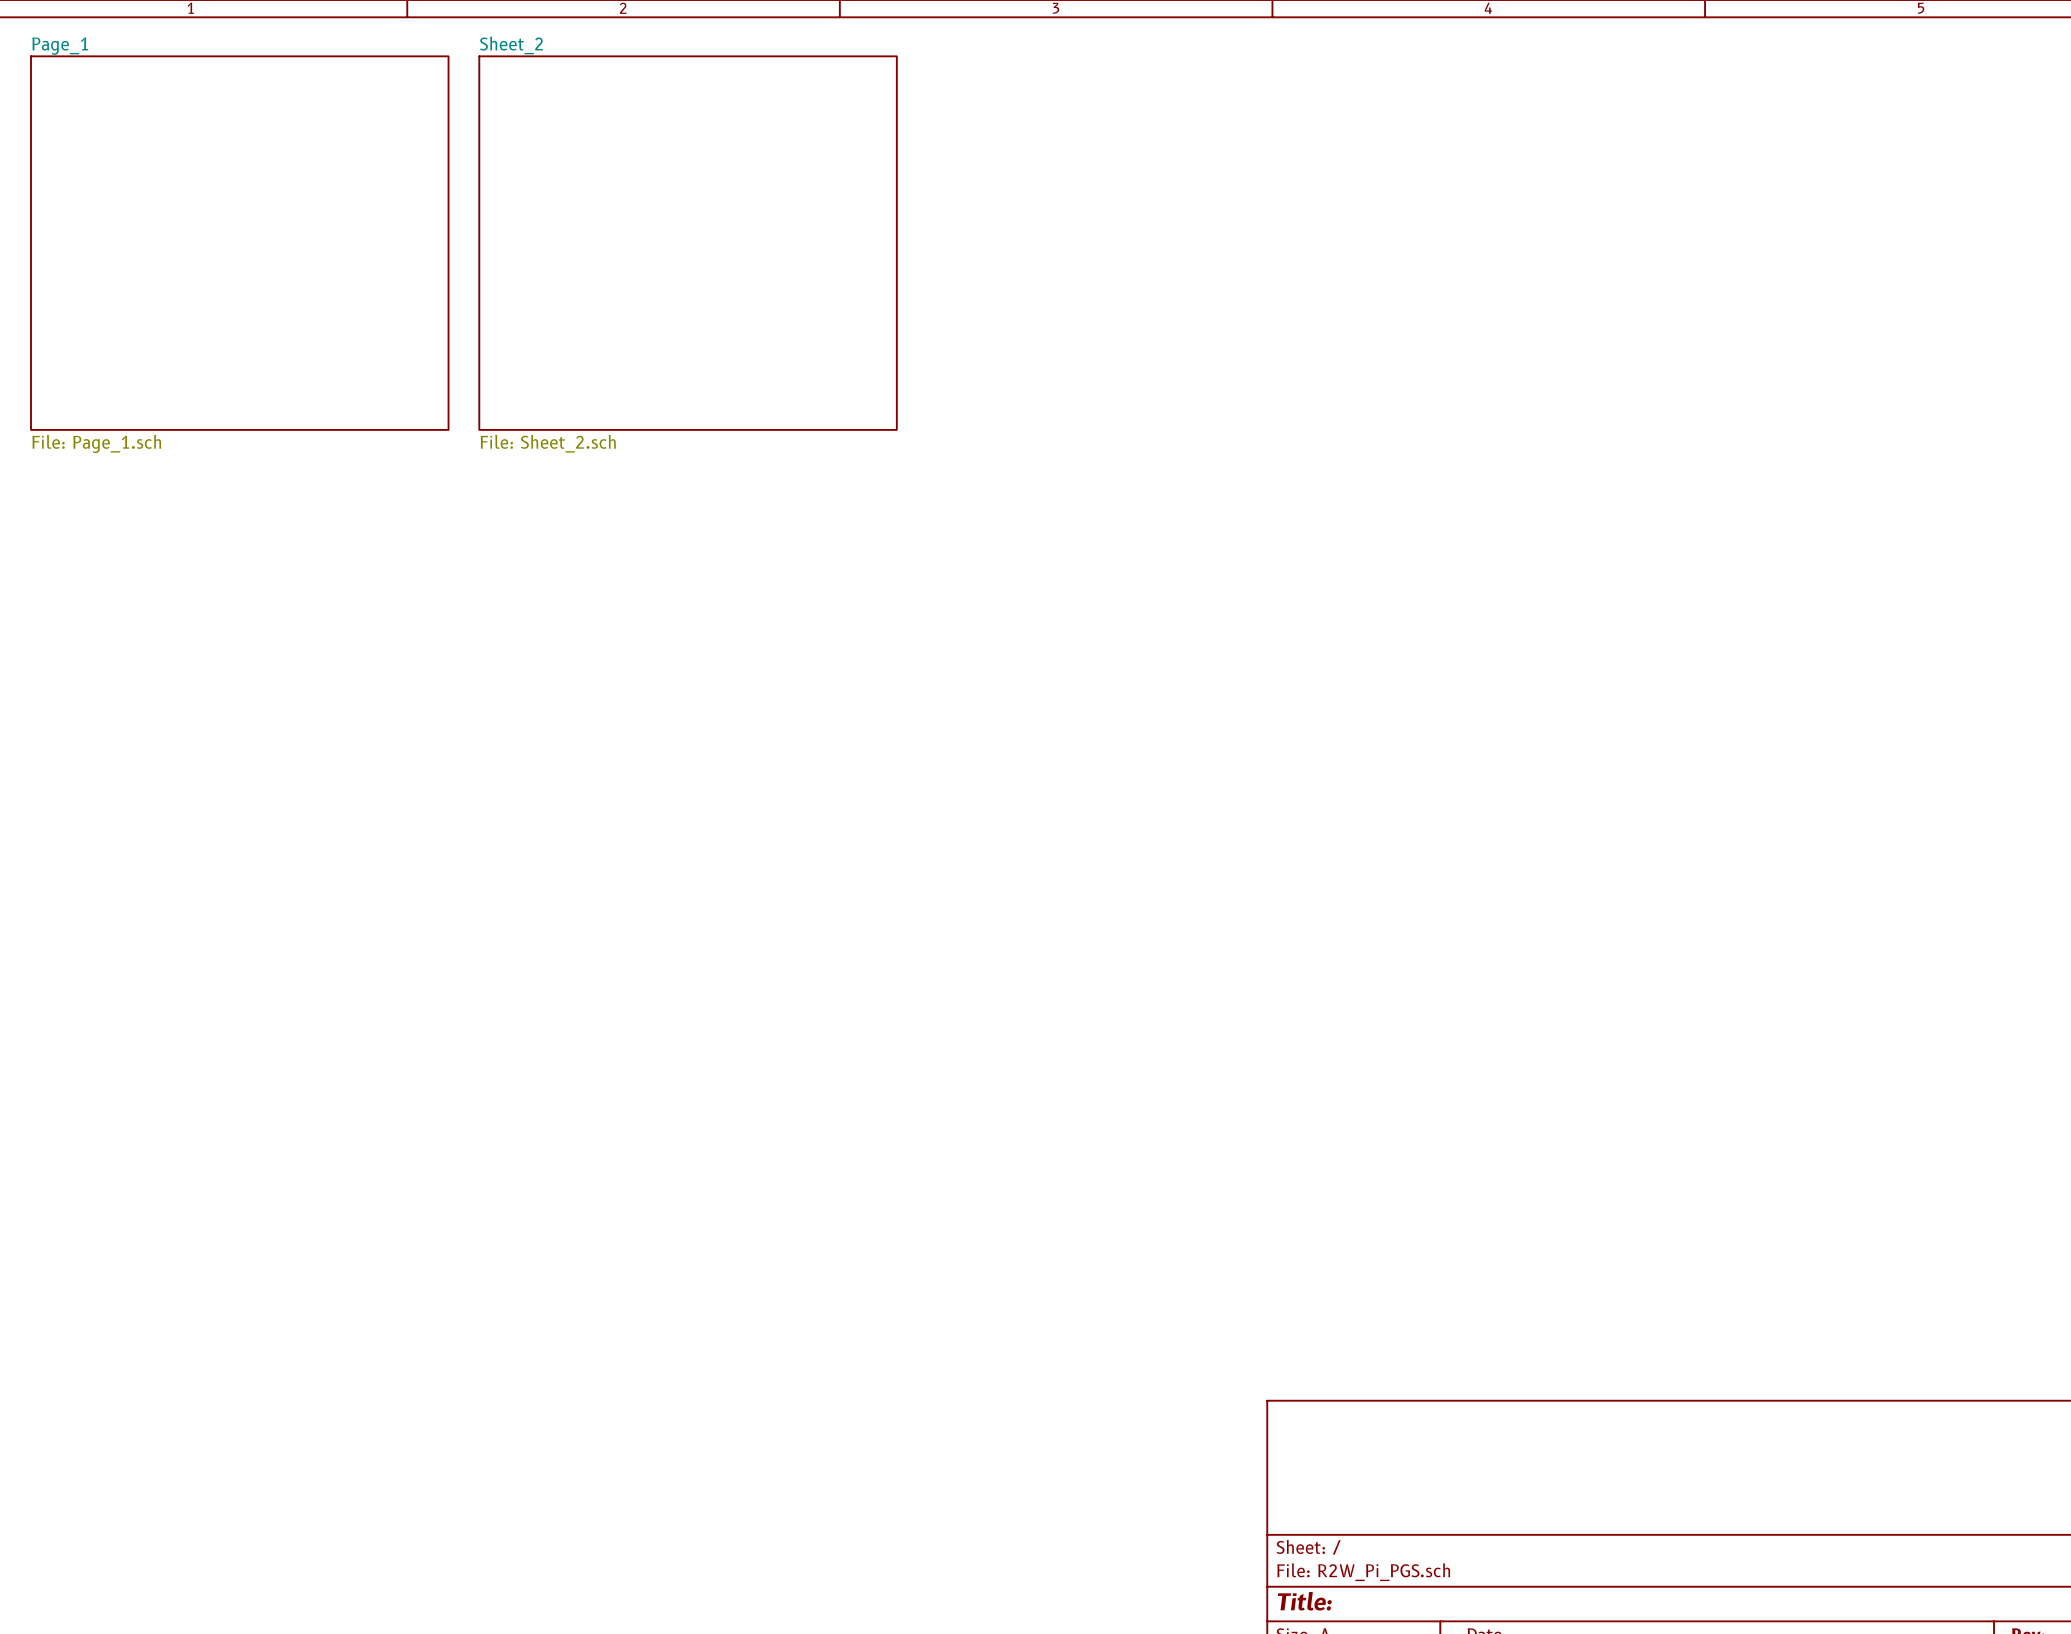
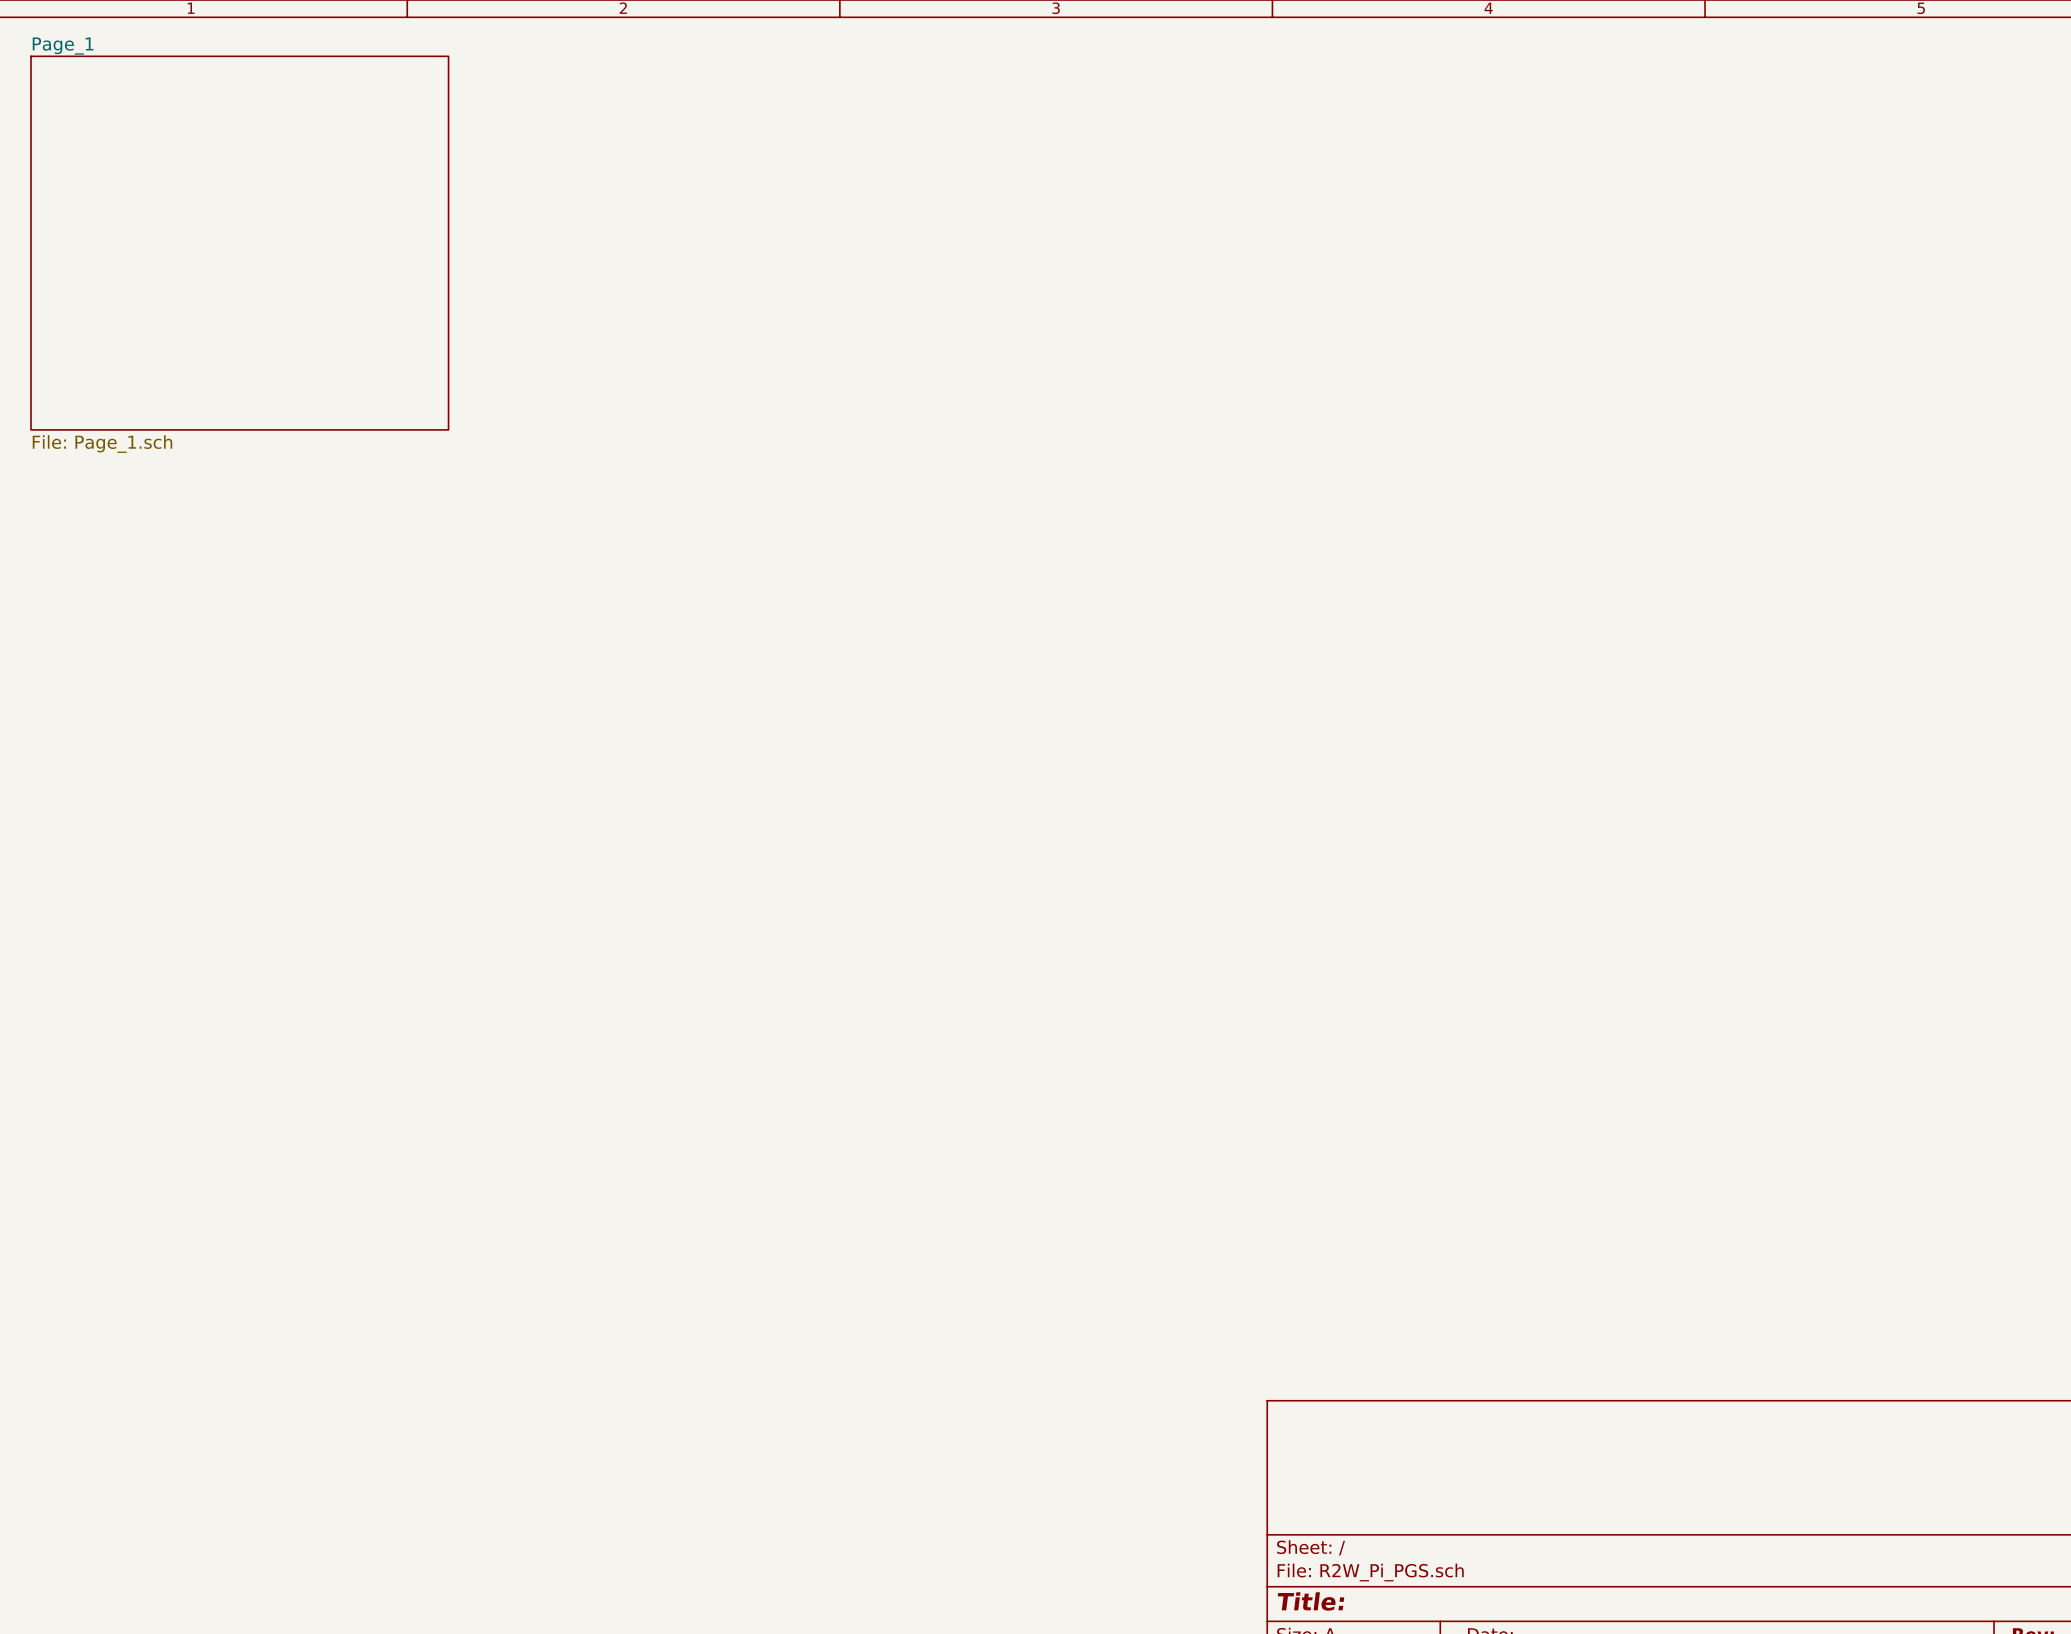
sheet Sheet_2: File: Sheet_2.sch (688, 243) -> none

